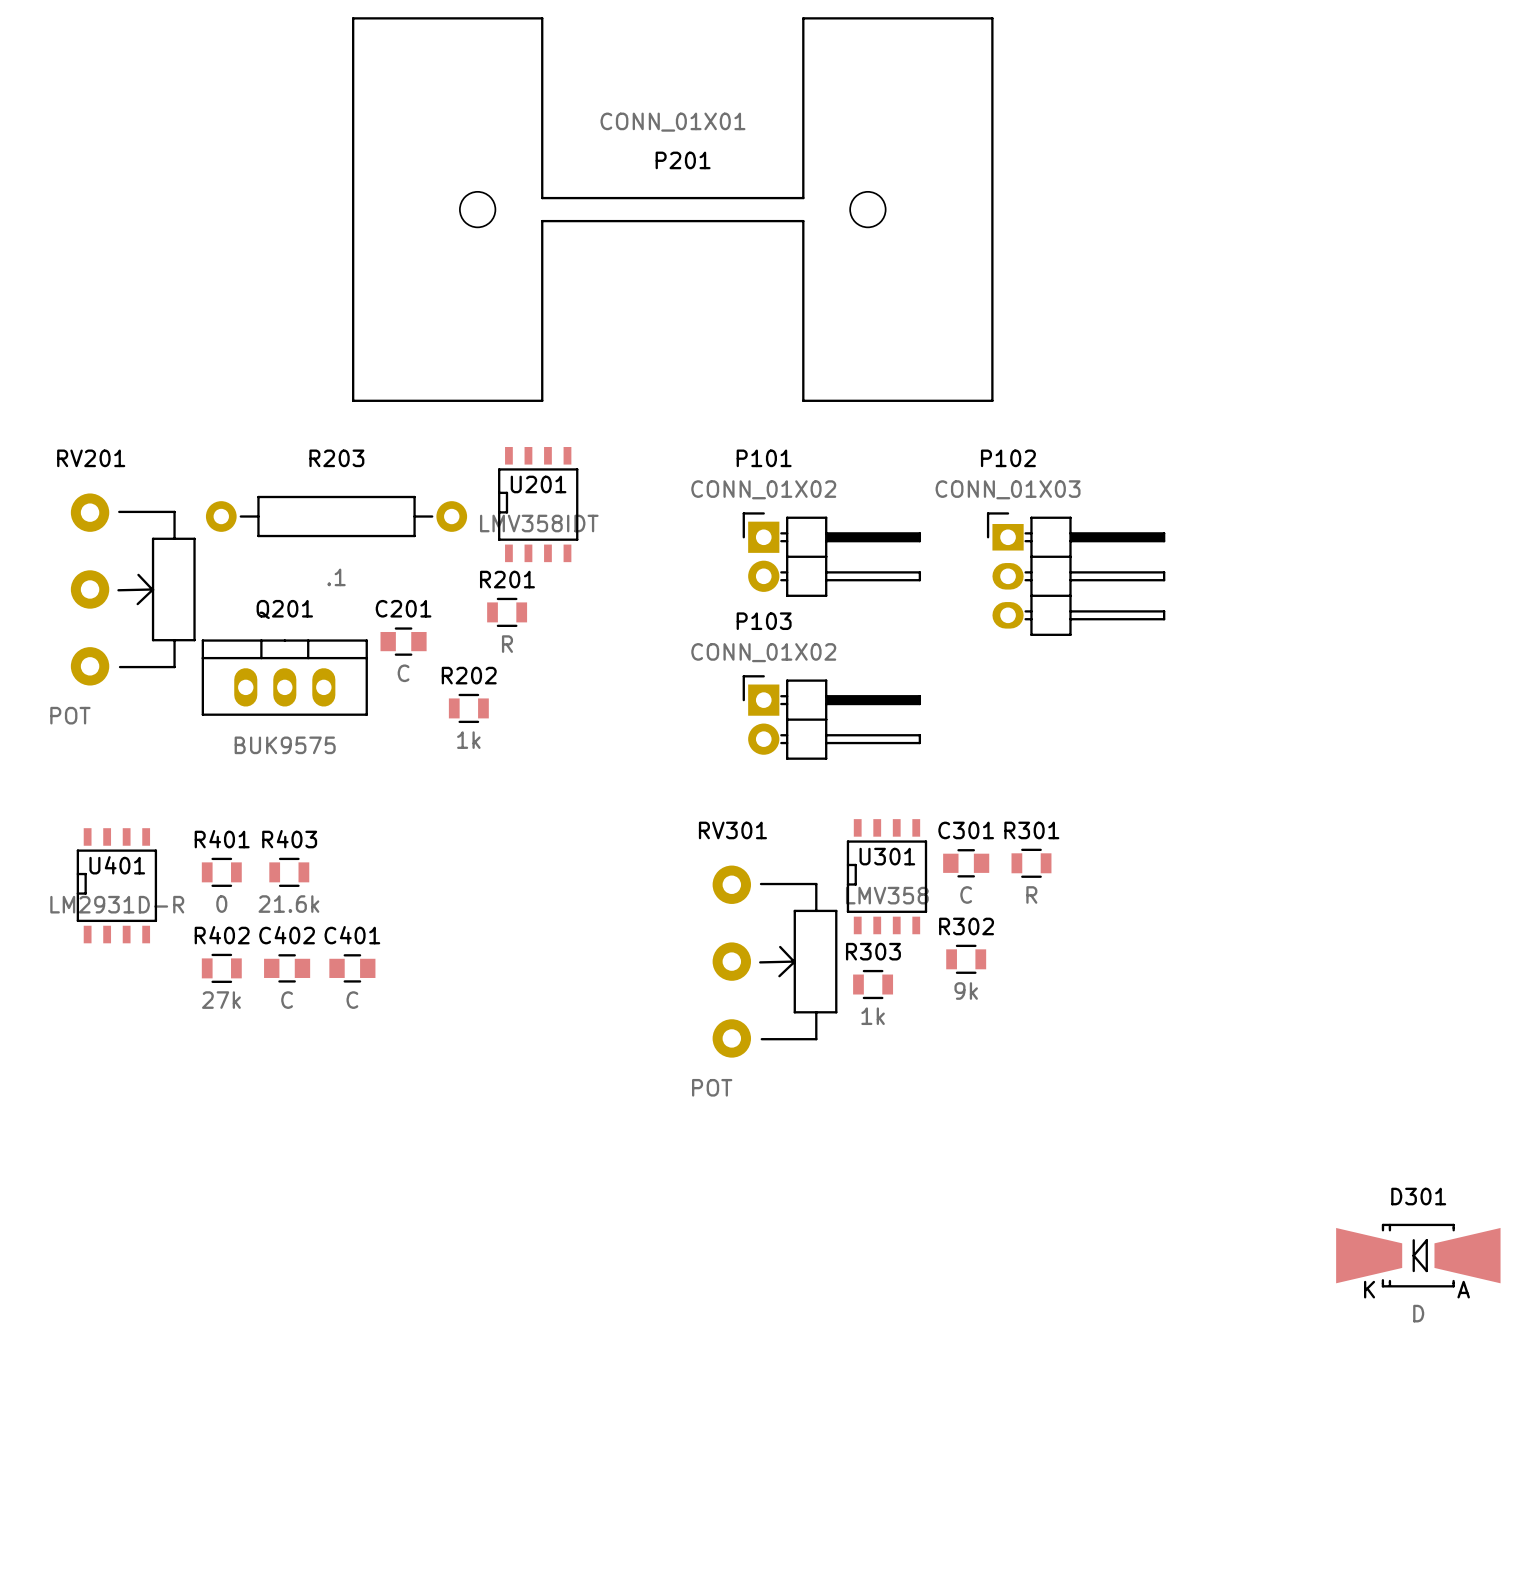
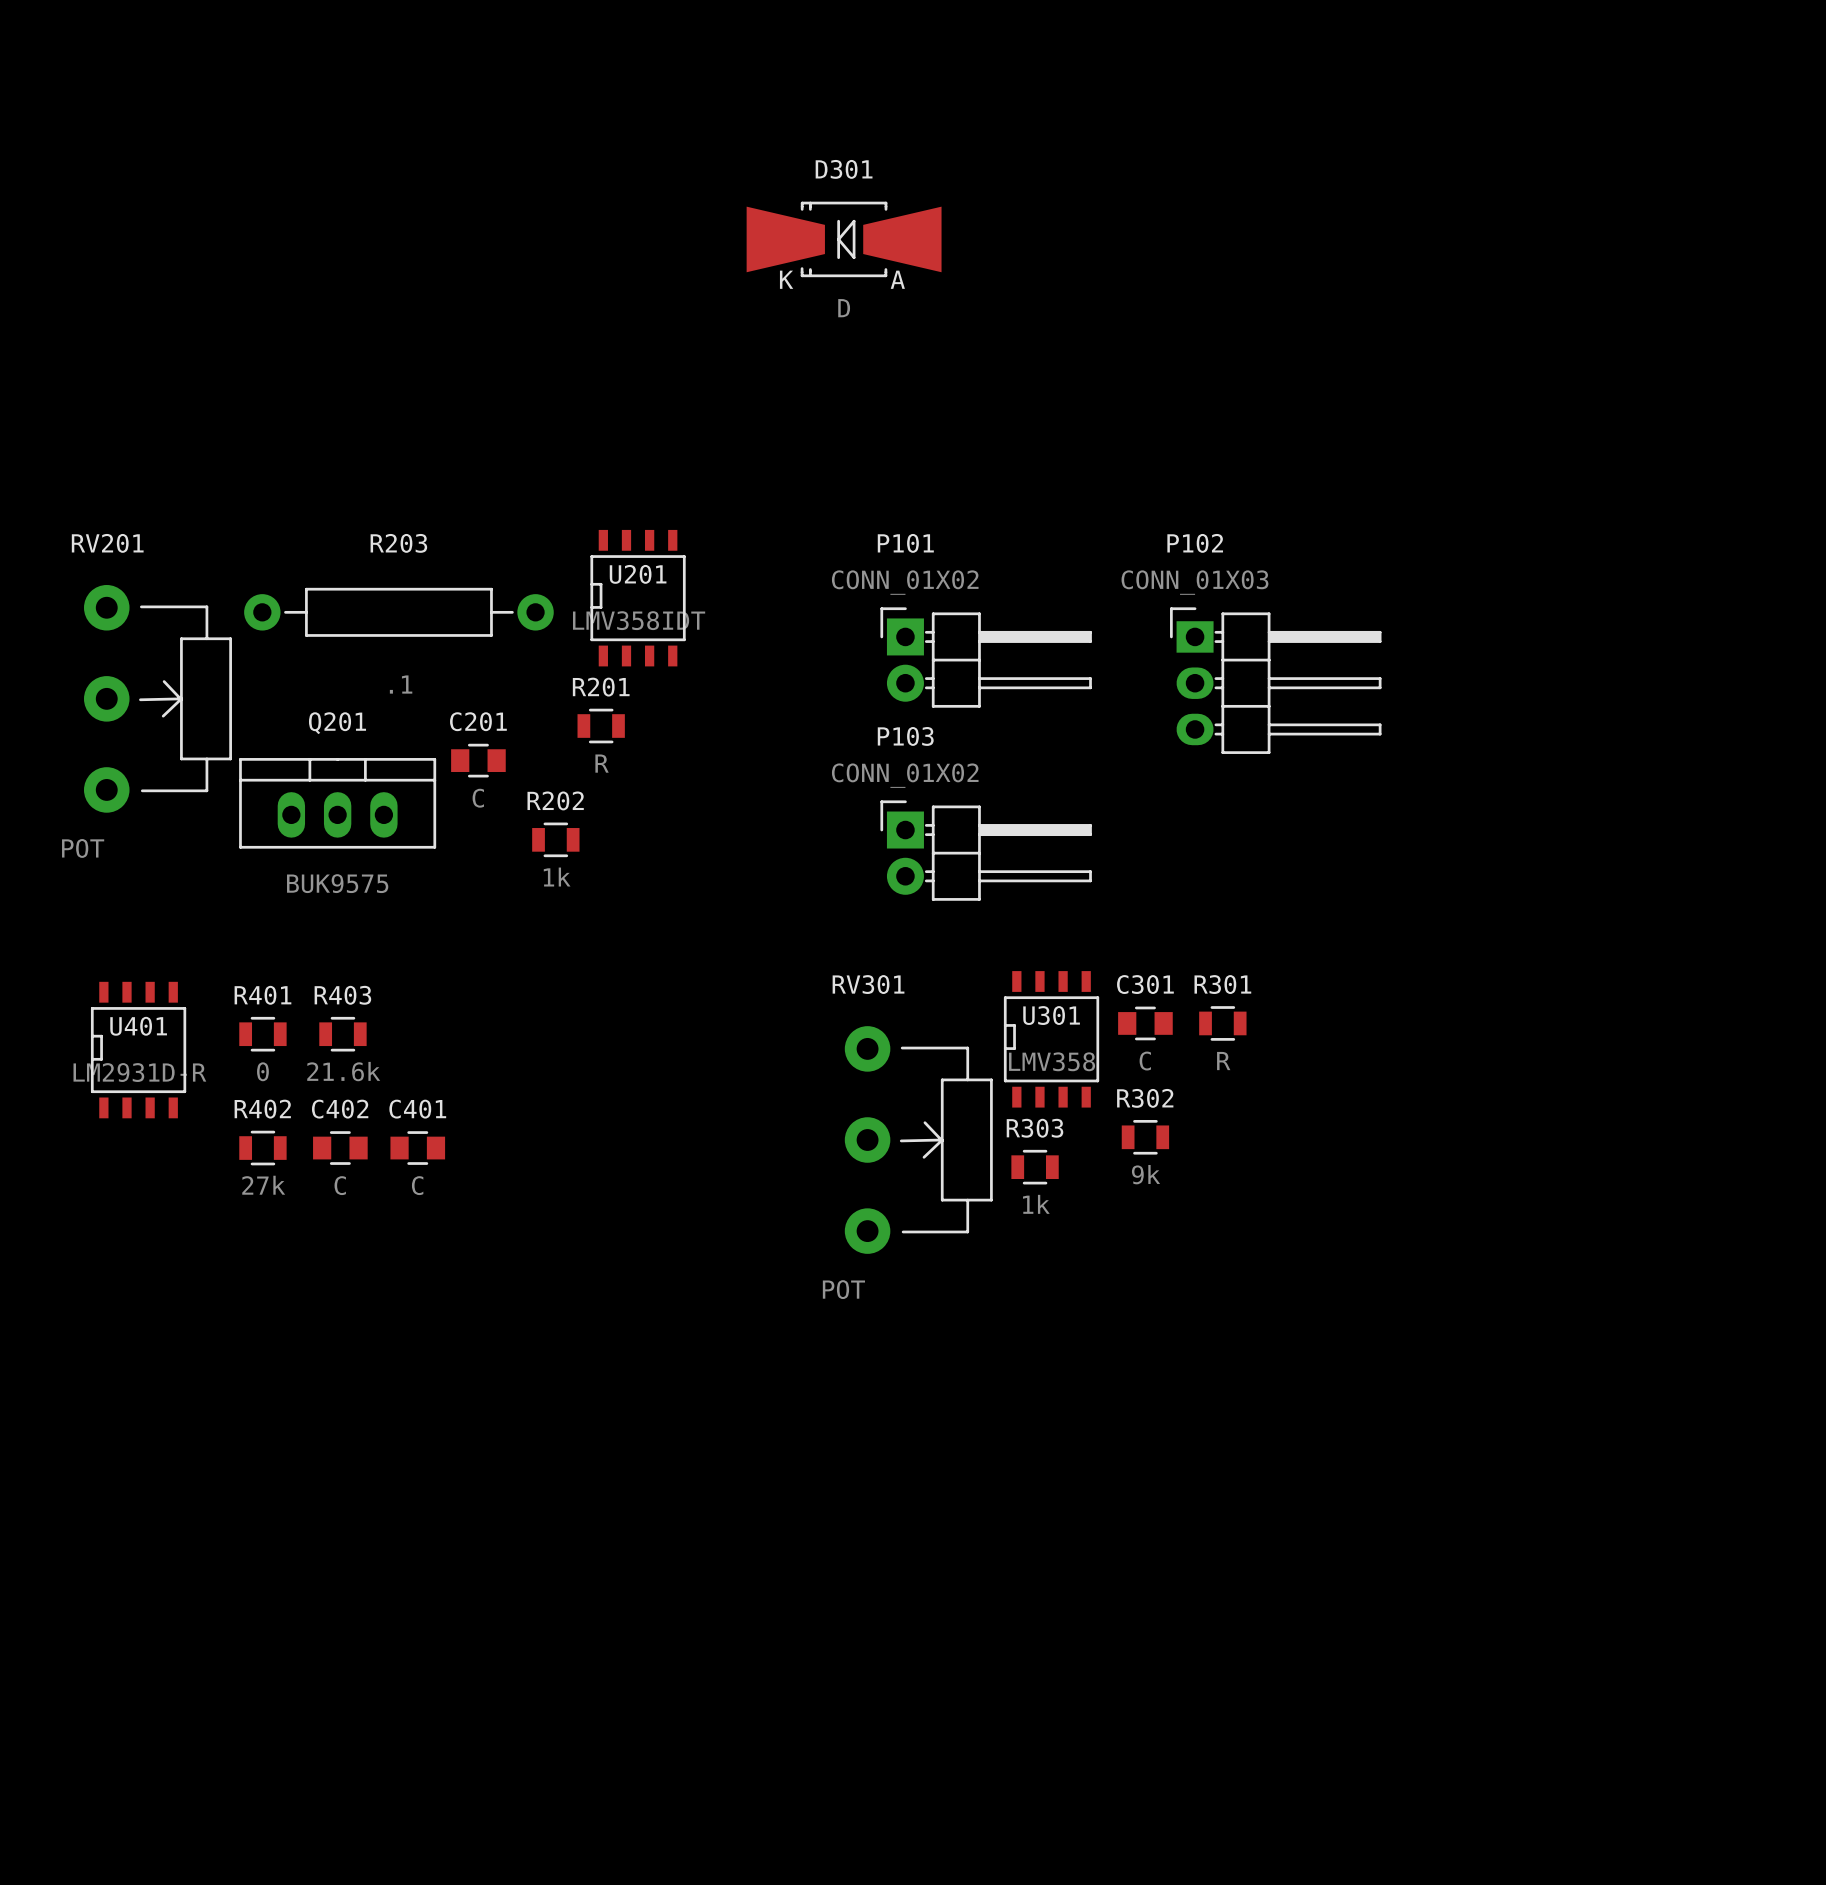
P201: CONN_01X01 (672, 209) -> none
D301 position: (1418, 1255) -> (844, 239)

